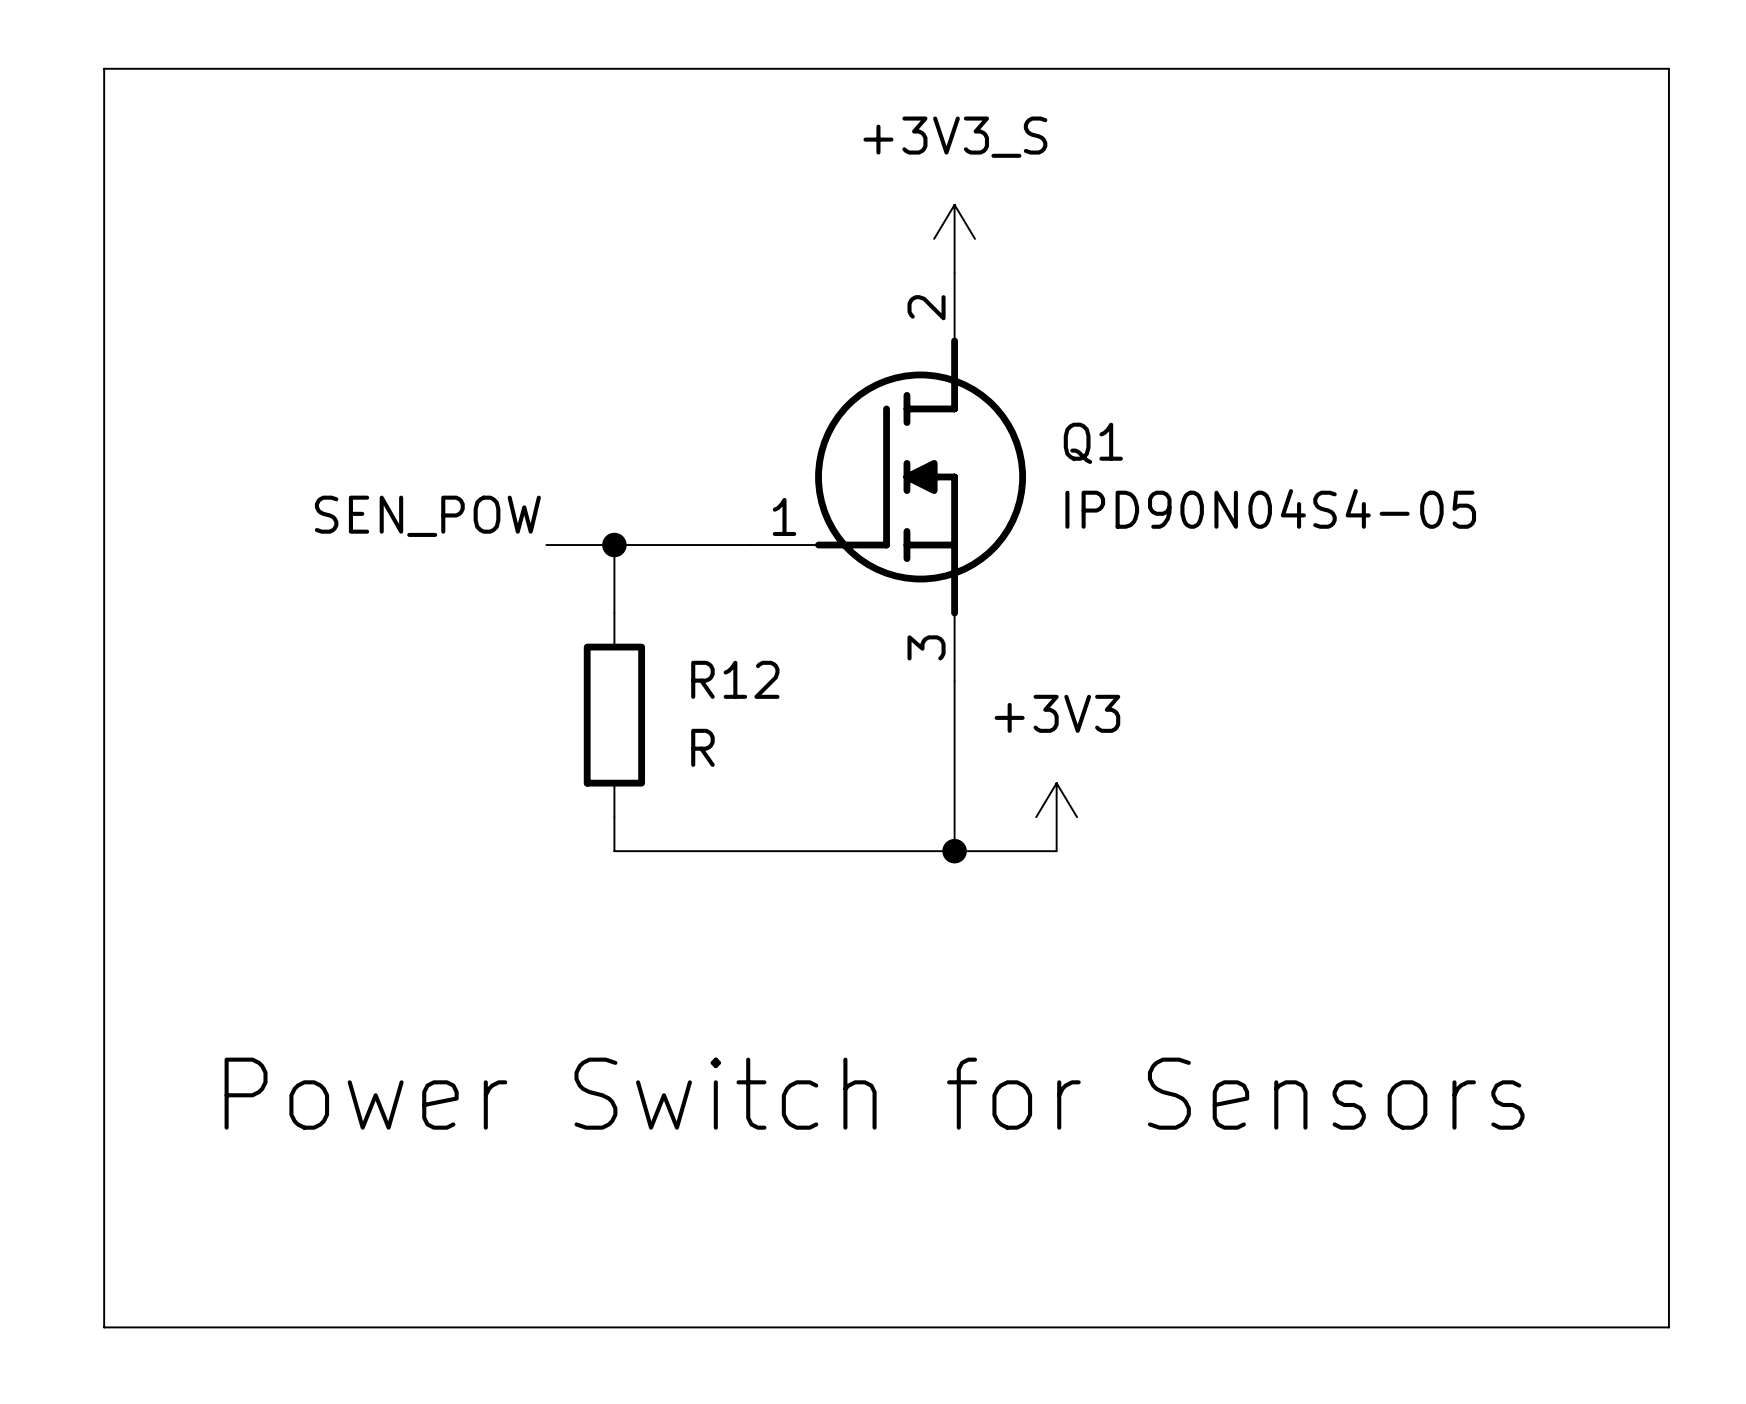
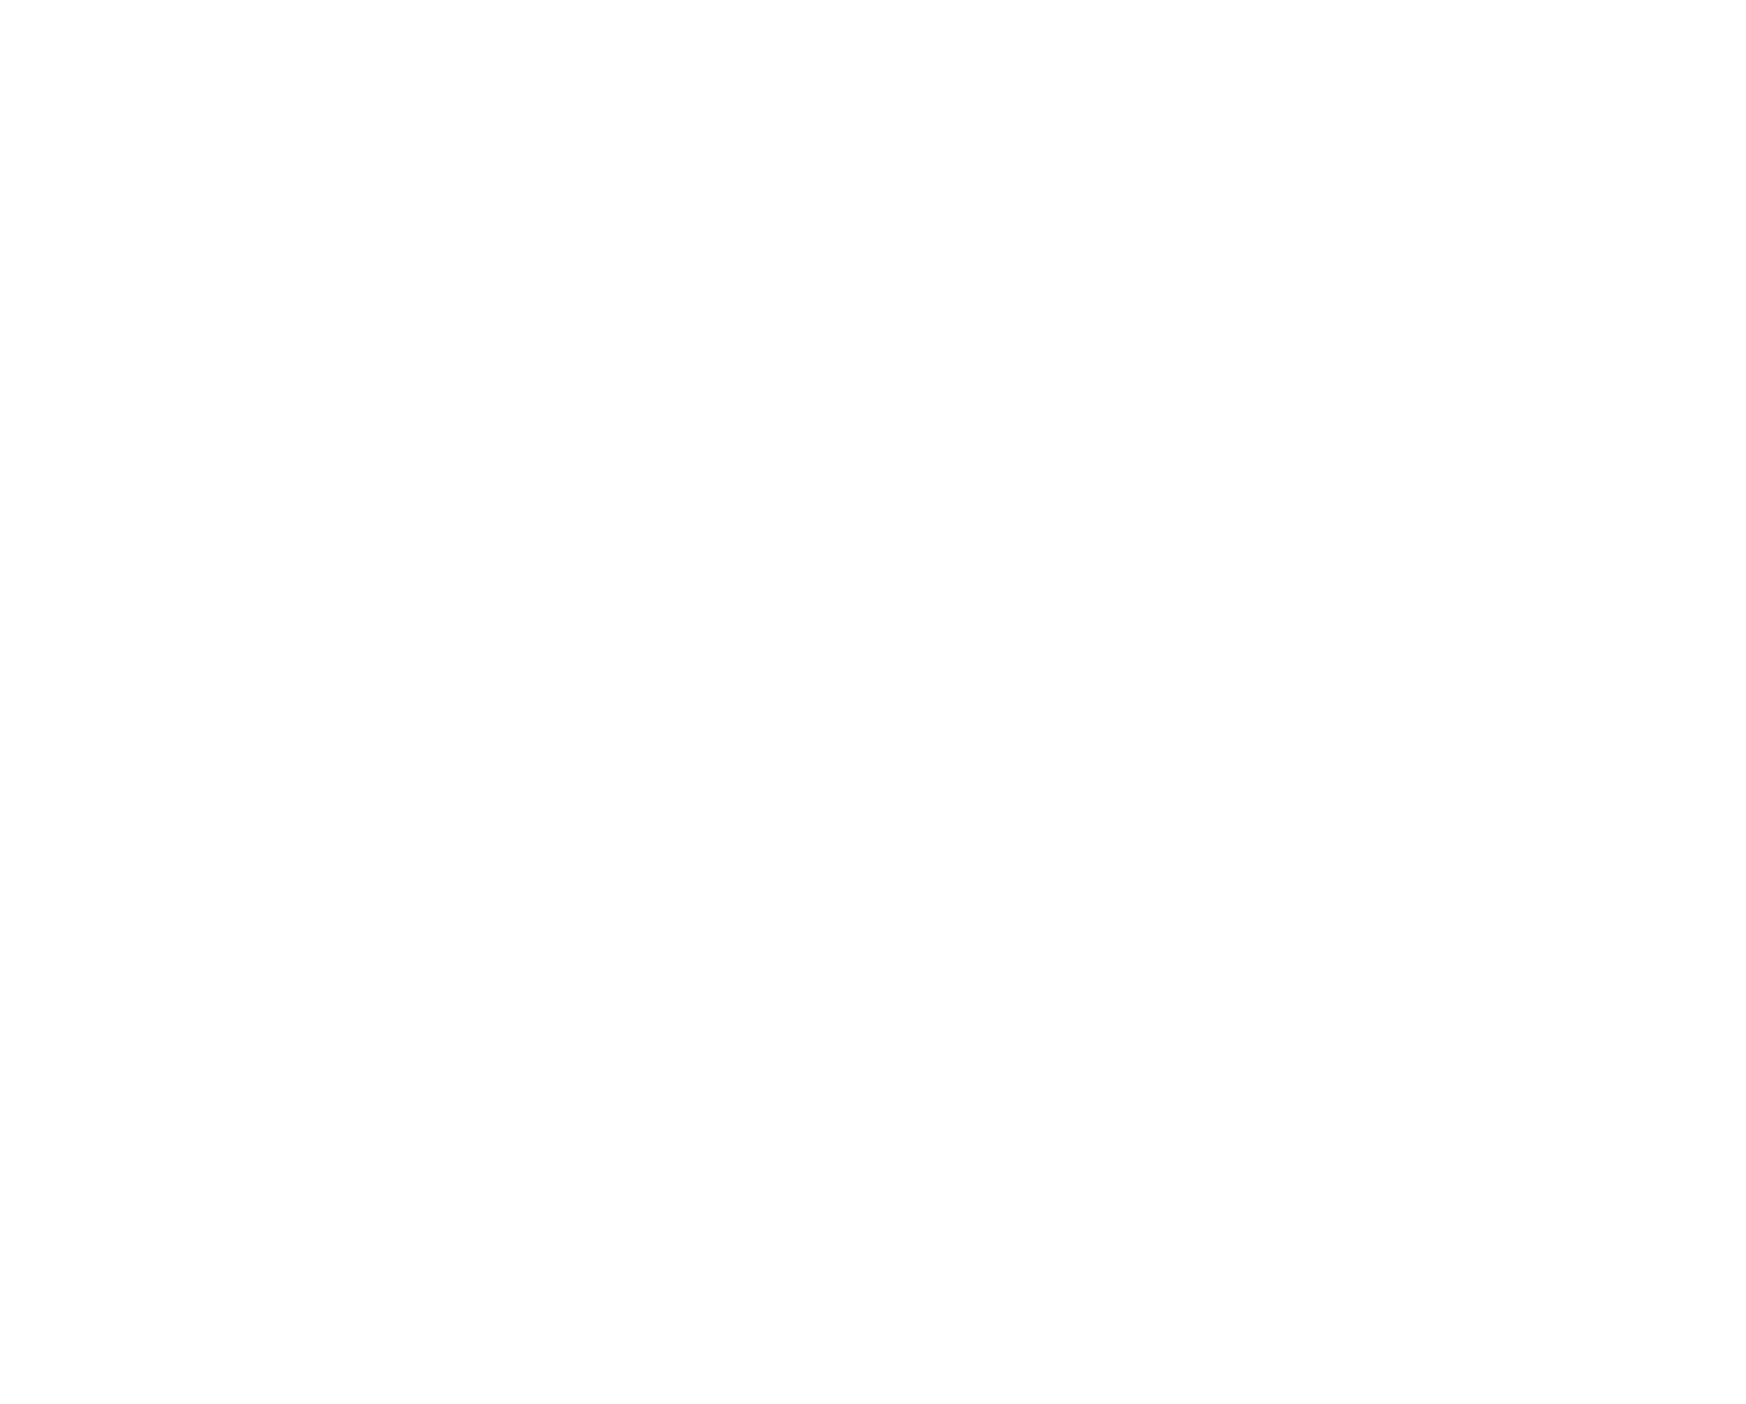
line: (104, 68) (1668, 68) (1668, 1327) (104, 1327) (104, 68) -> none
power symbol: +3V3_S (954, 238) -> none
Q1: IPD90N04S4-05 (888, 476) -> none
label: SEN_POW (427, 516) -> none
wire: (546, 545) (750, 545) -> none
wire: (614, 545) (614, 613) -> none
junction: (614, 545) -> none
wire: (954, 681) (954, 851) -> none
R12: R (614, 715) -> none
wire: (614, 817) (614, 851) (1056, 851) -> none
power symbol: +3V3 (1056, 817) -> none
junction: (954, 851) -> none
text: Power Switch for Sensors (874, 1093) -> none

